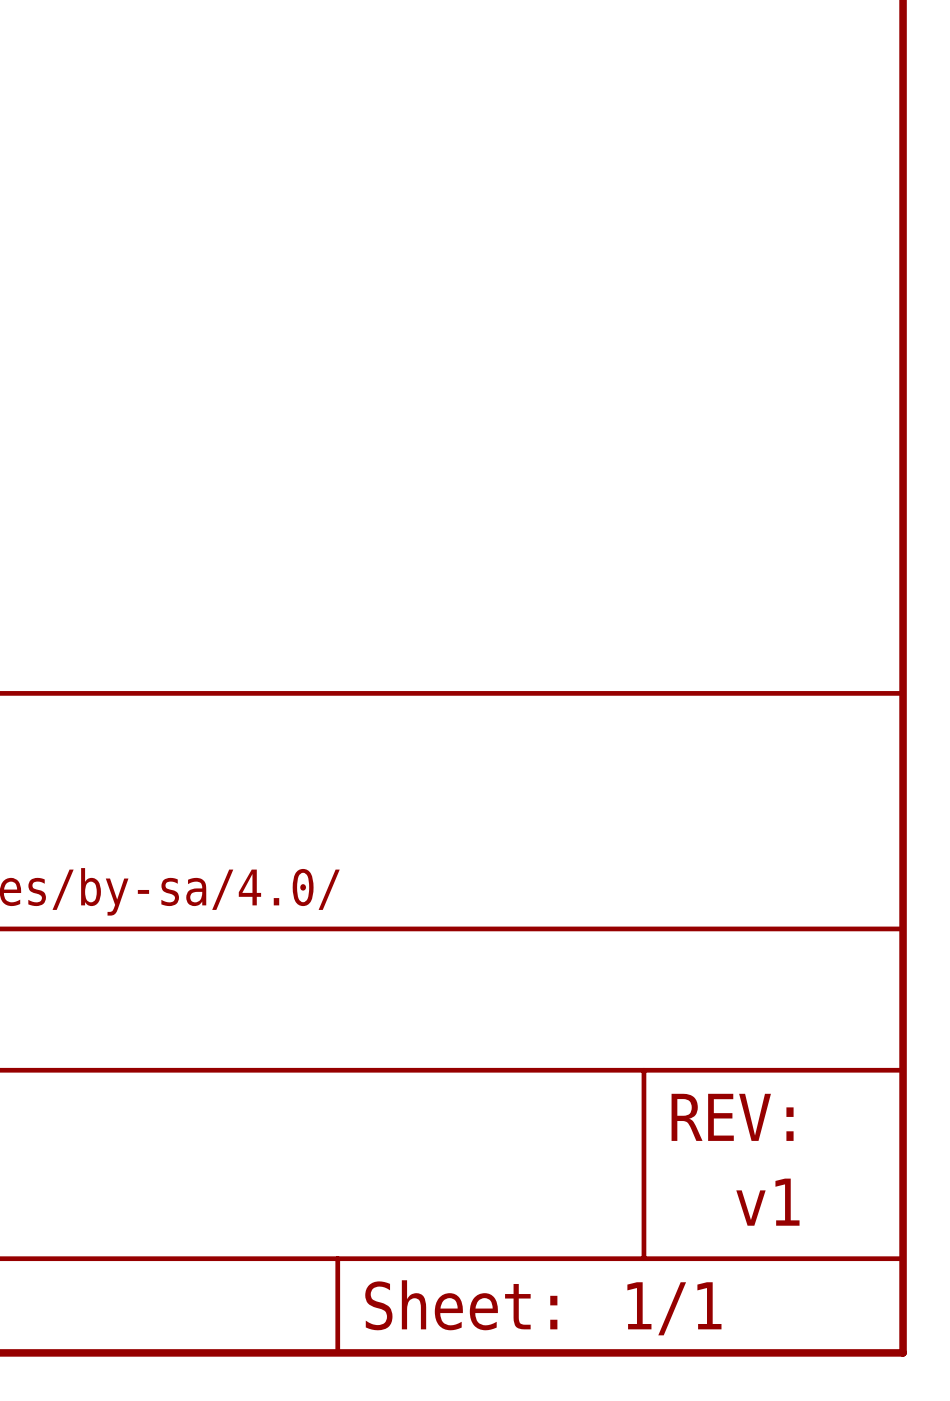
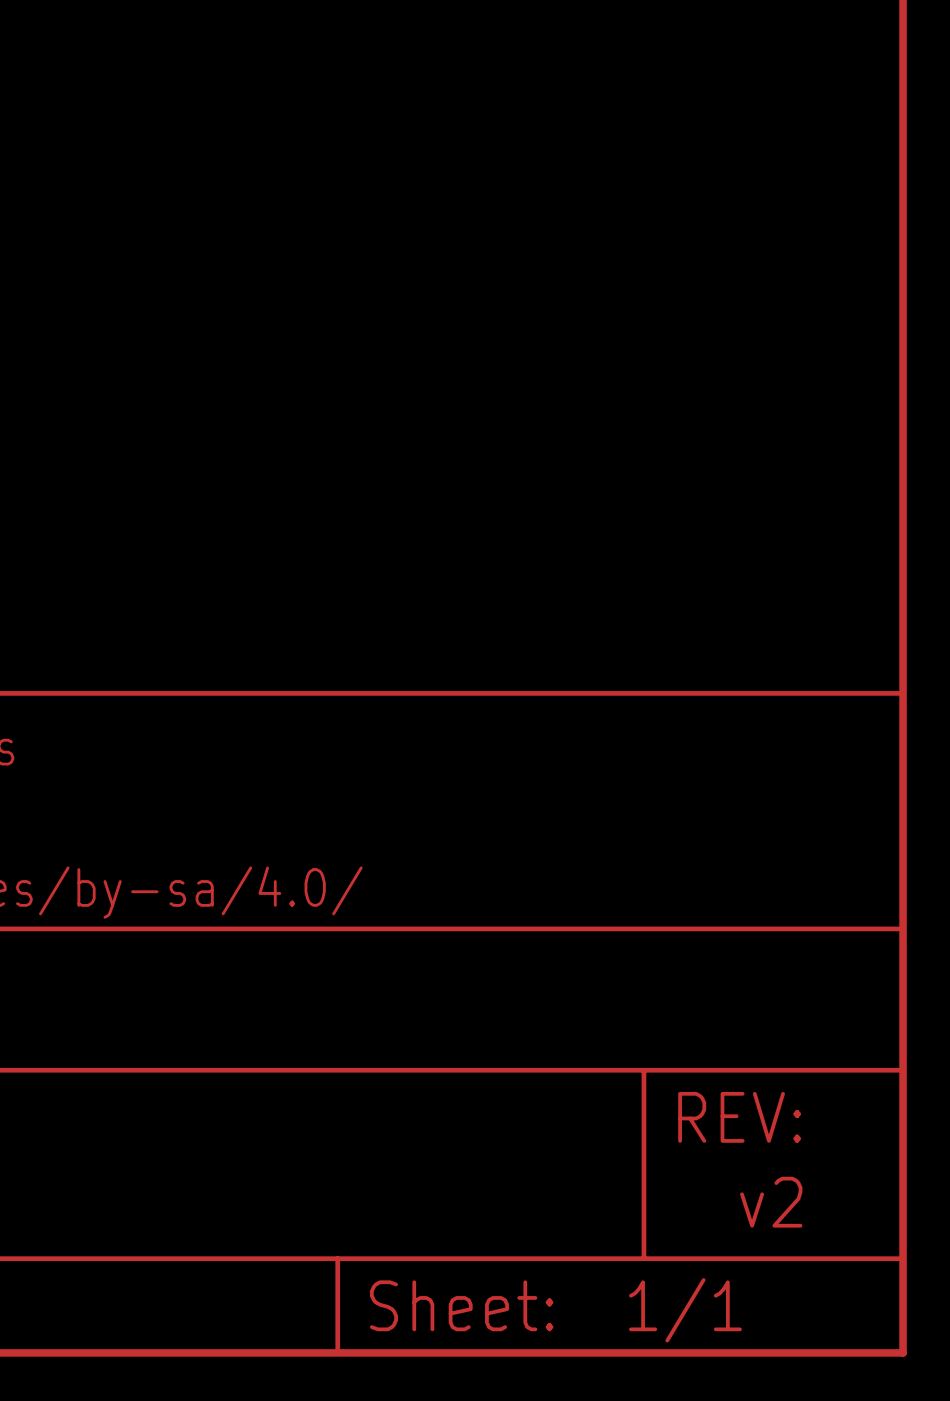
text: v1 (767, 1202) -> v2 (771, 1202)

